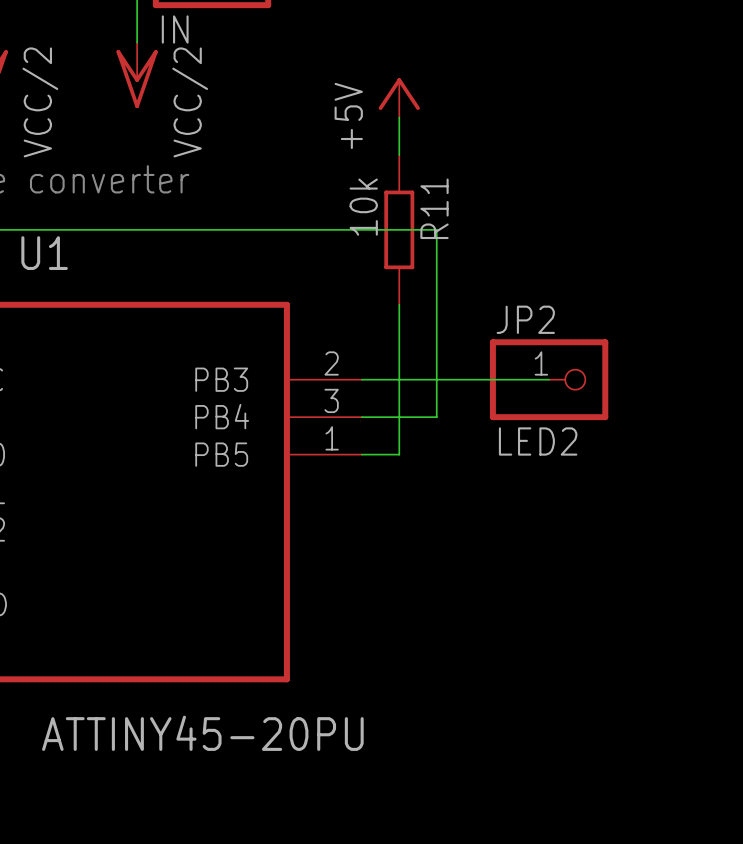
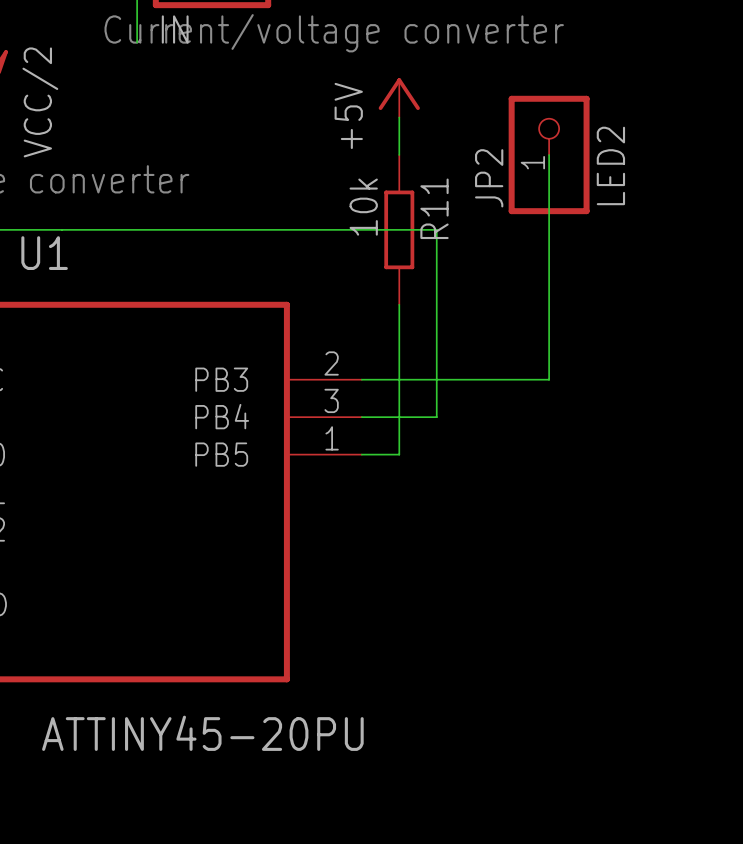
text: none -> Current/voltage converter (334, 33)
power symbol: VCC/2 (137, 75) -> none
wire: none -> (549, 154) (549, 379)
JP2 rotation: 0° (549, 379) -> 90° counterclockwise (549, 154)
JP2 position: (549, 379) -> (549, 154)

